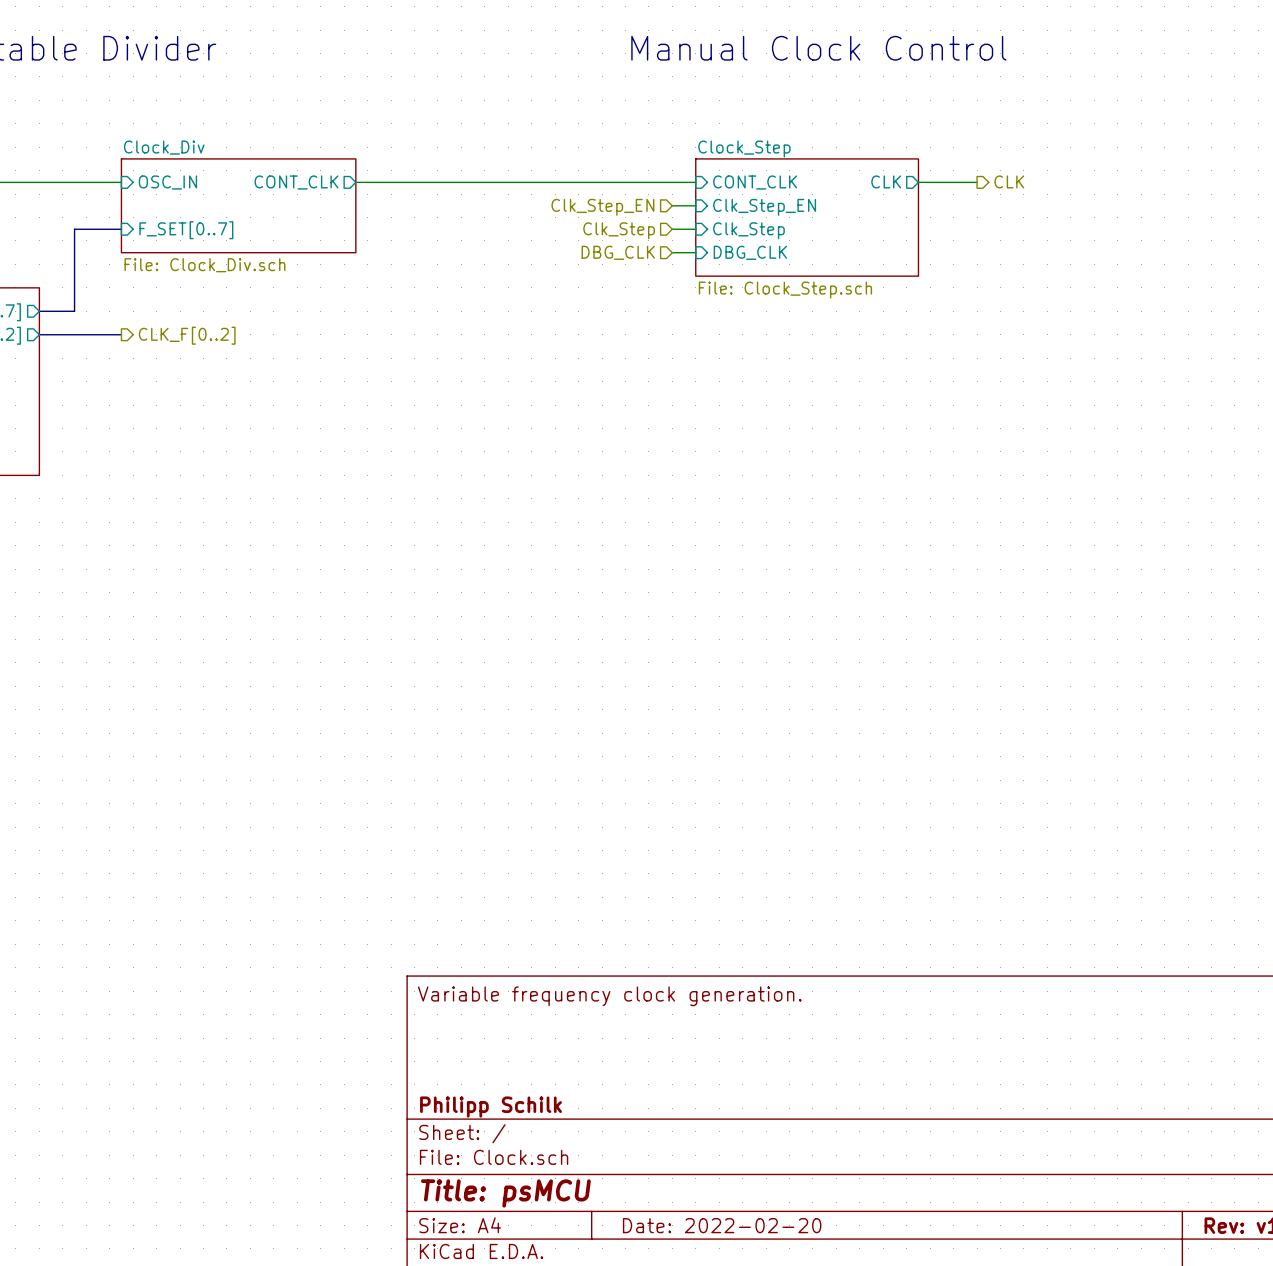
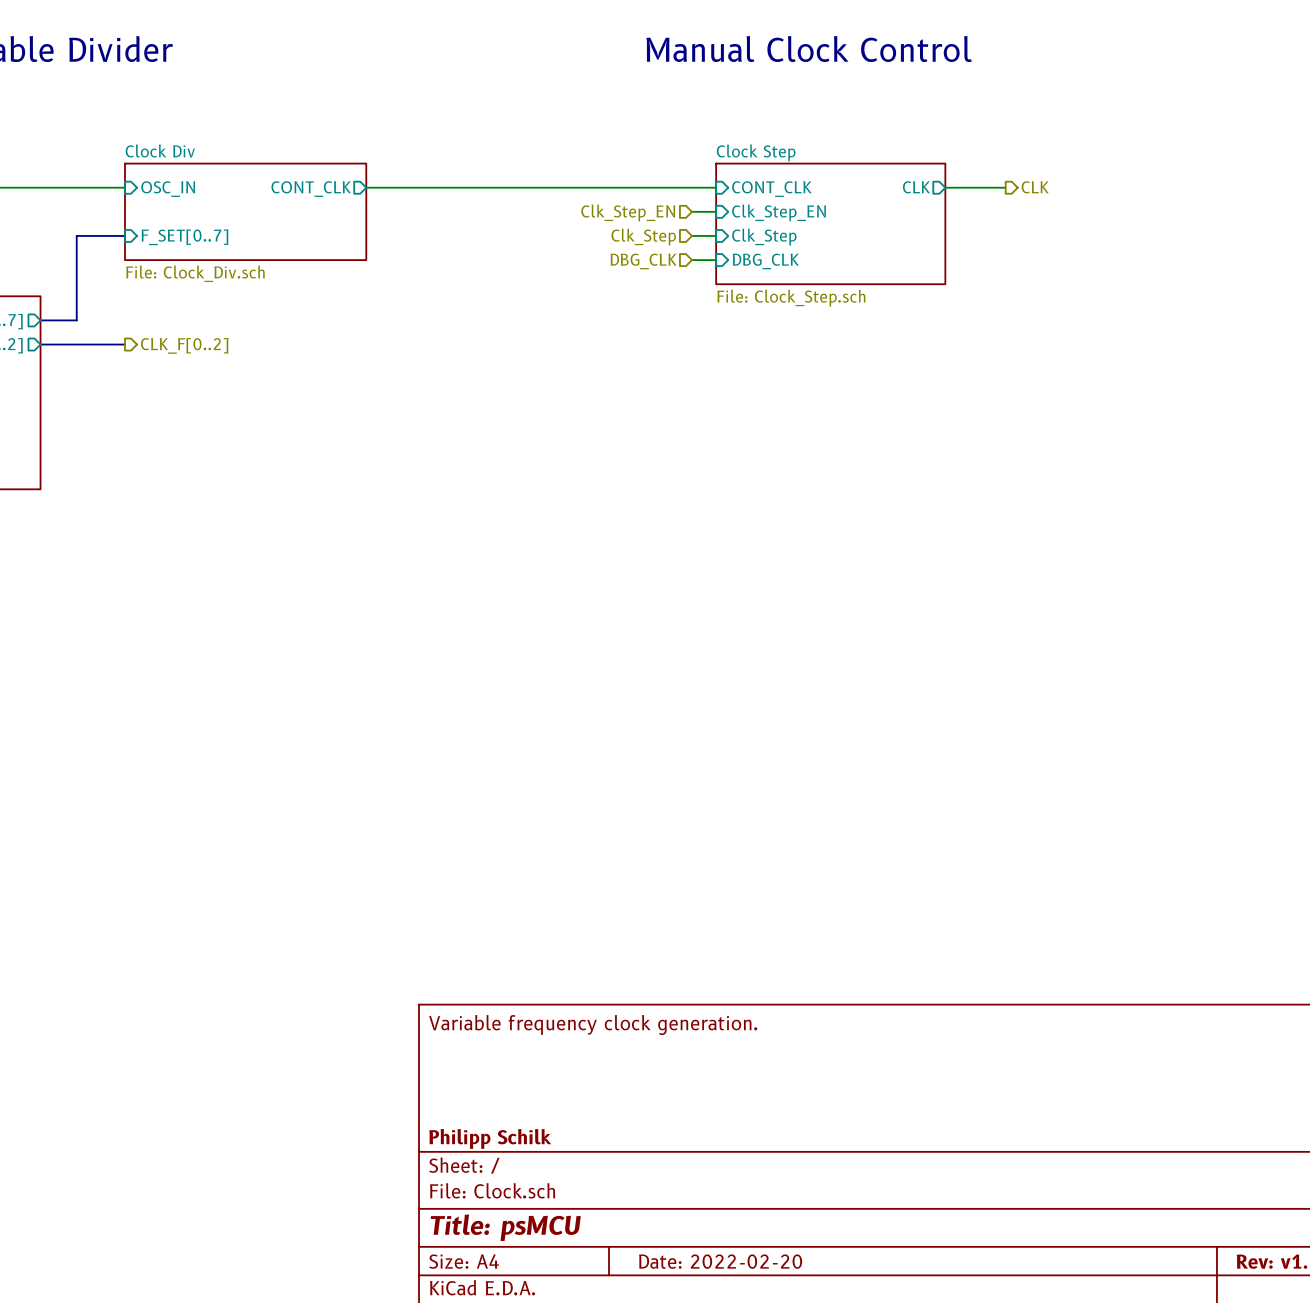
sheet Clock_Div name: Clock_Div (164, 147) -> Clock Div (160, 151)
sheet Clock_Step name: Clock_Step (744, 148) -> Clock Step (756, 152)

